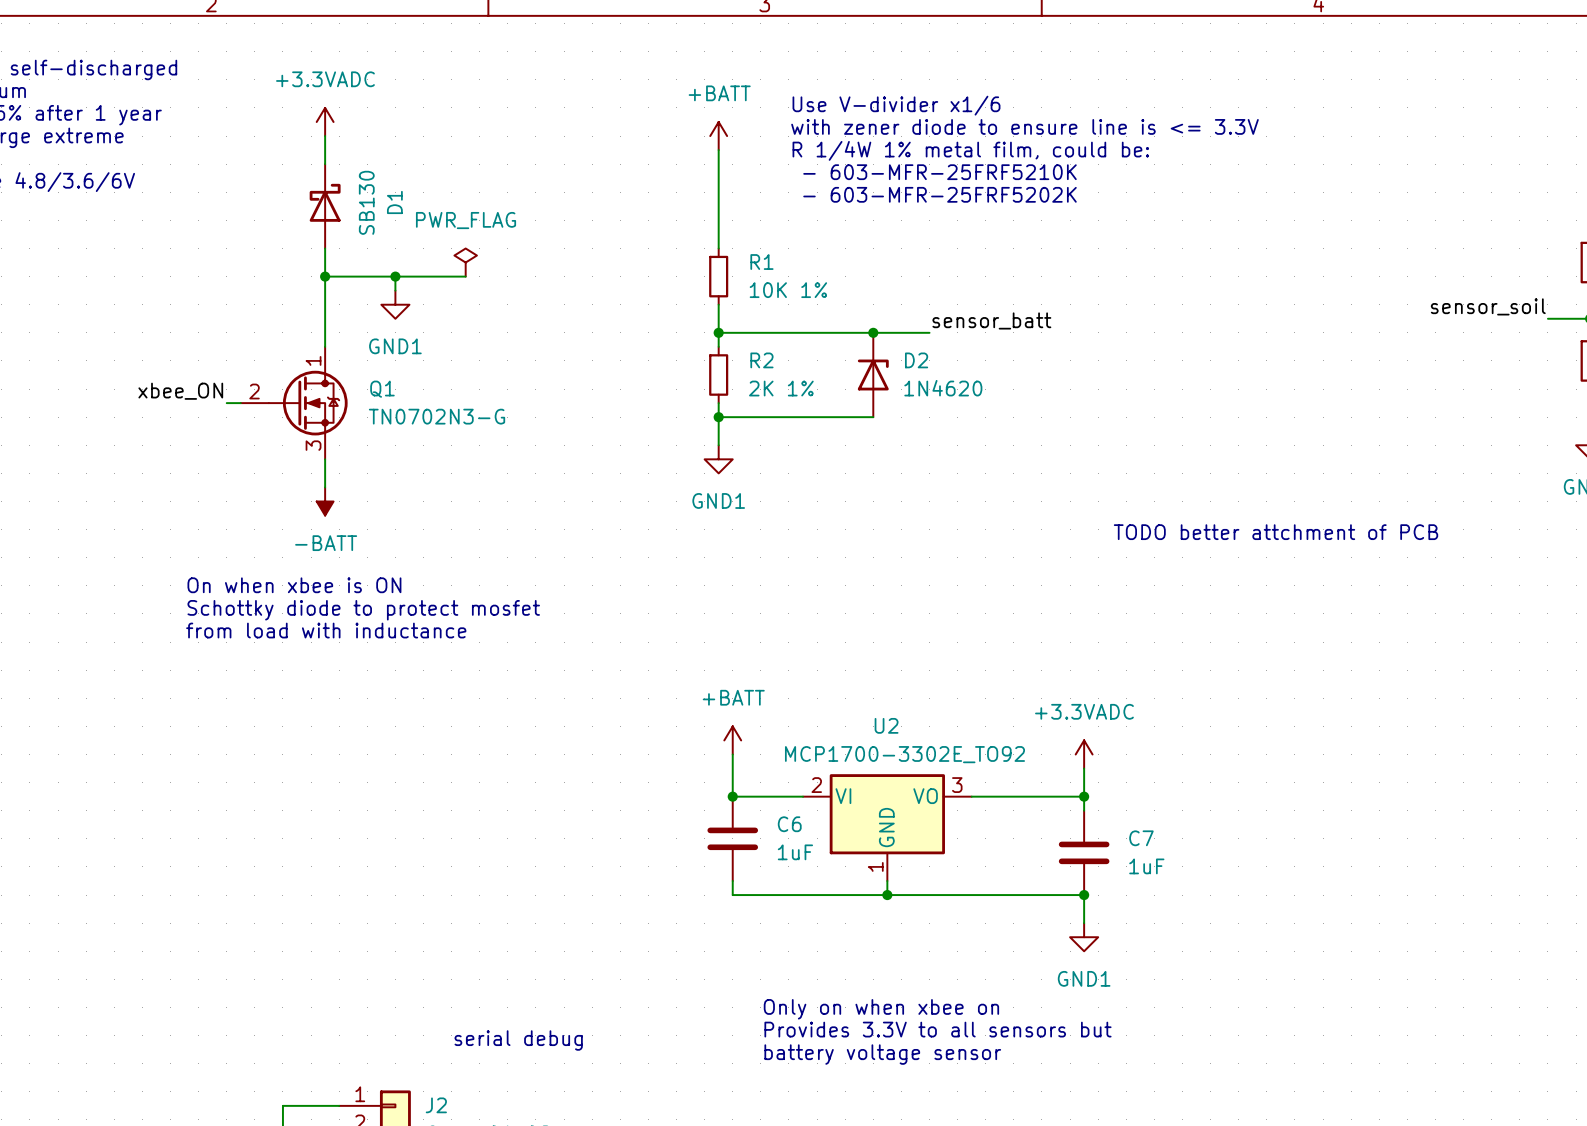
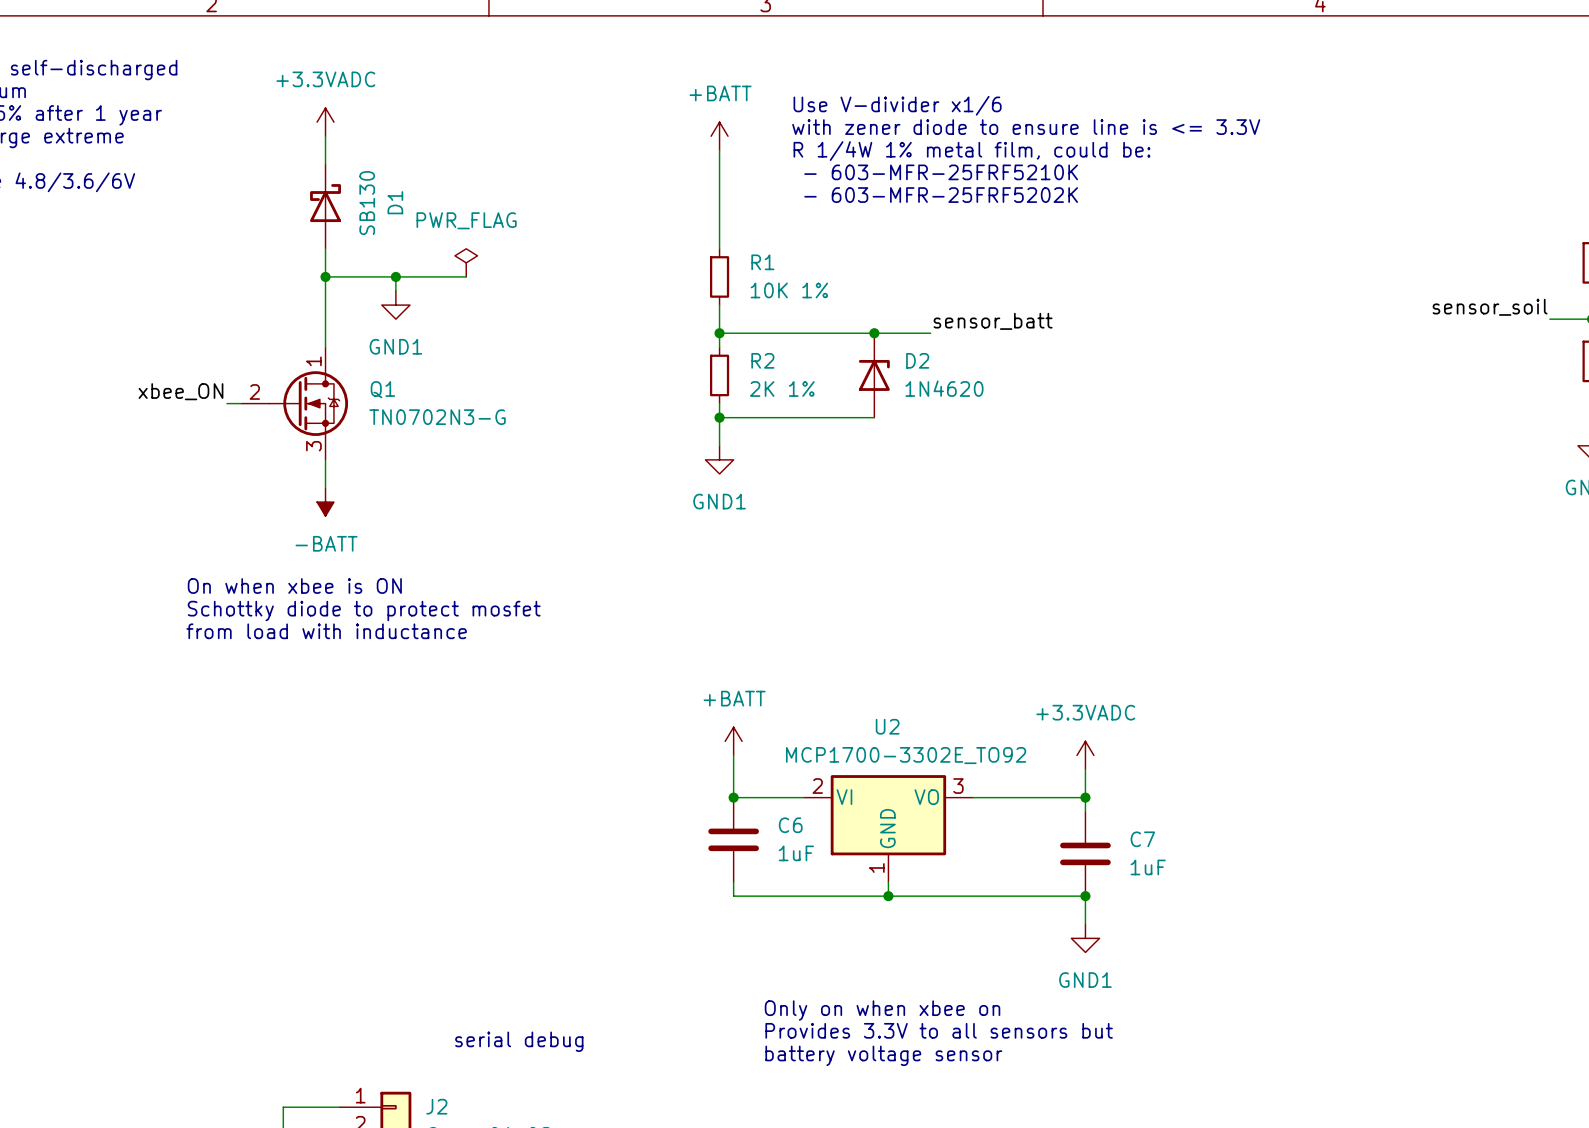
text: TODO better attchment of PCB (1275, 532) -> none

